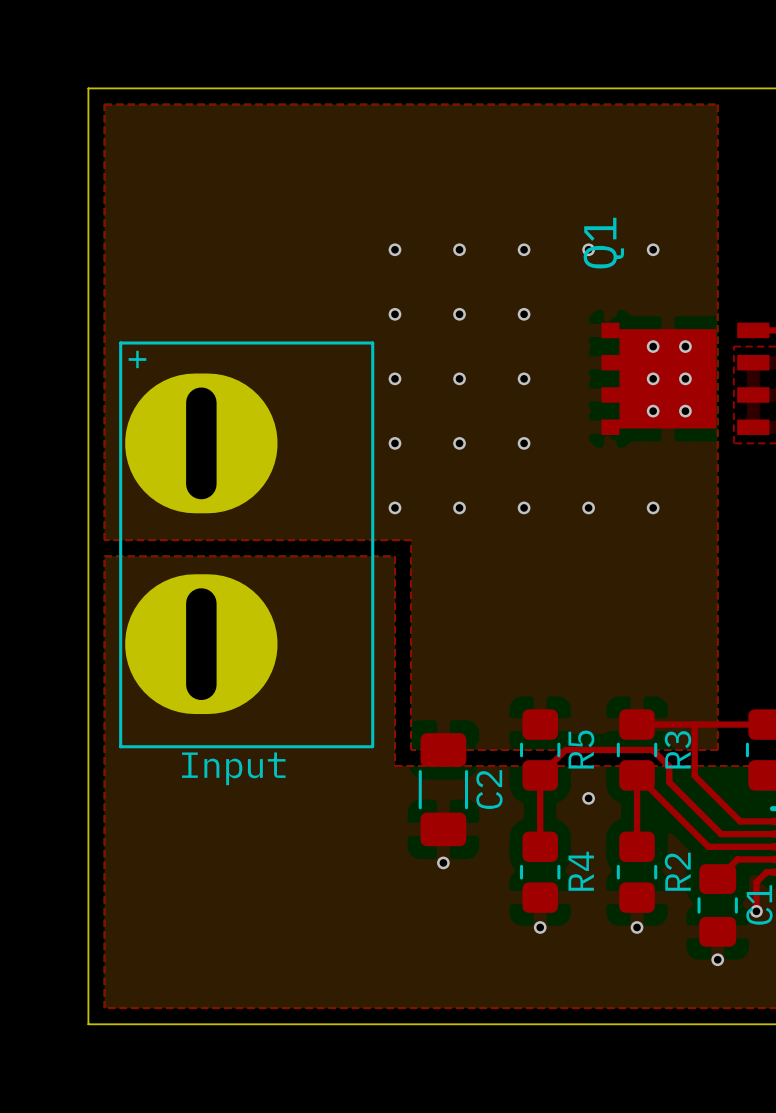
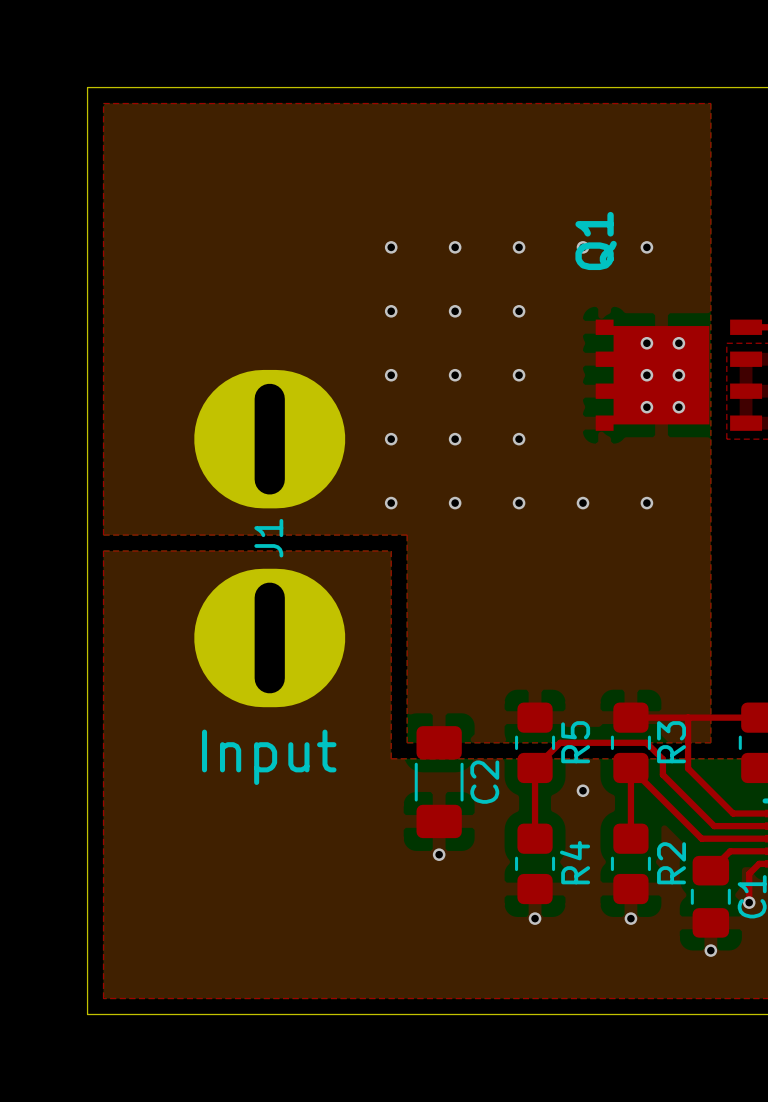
J1: none -> (269, 538)
Input: (246, 544) -> none
text: none -> Input (269, 757)

